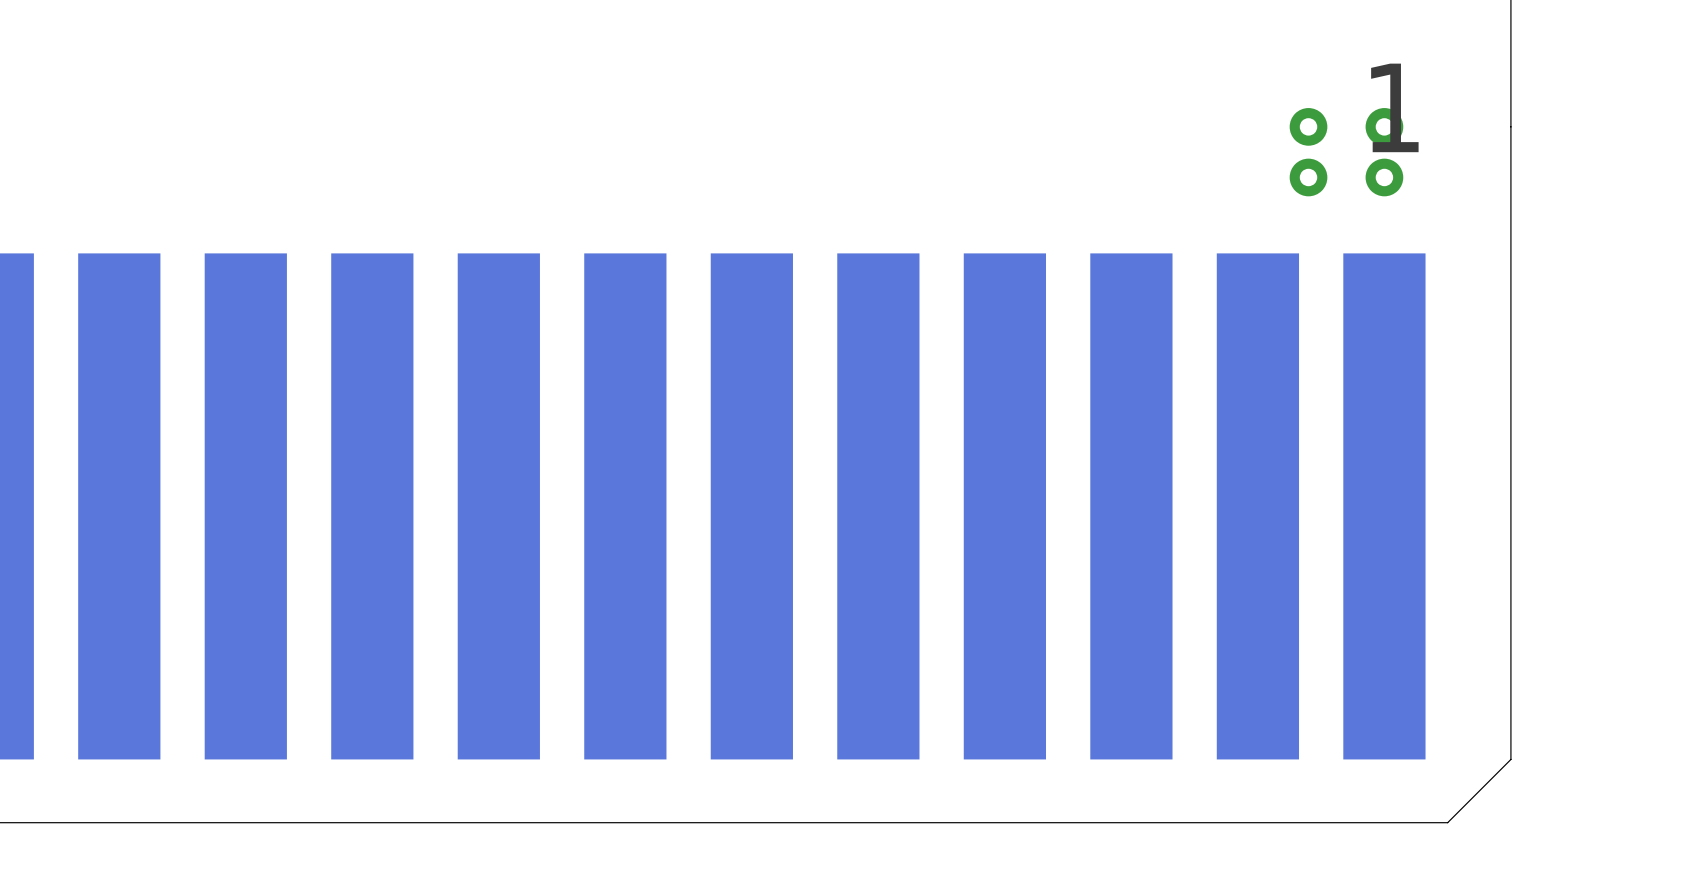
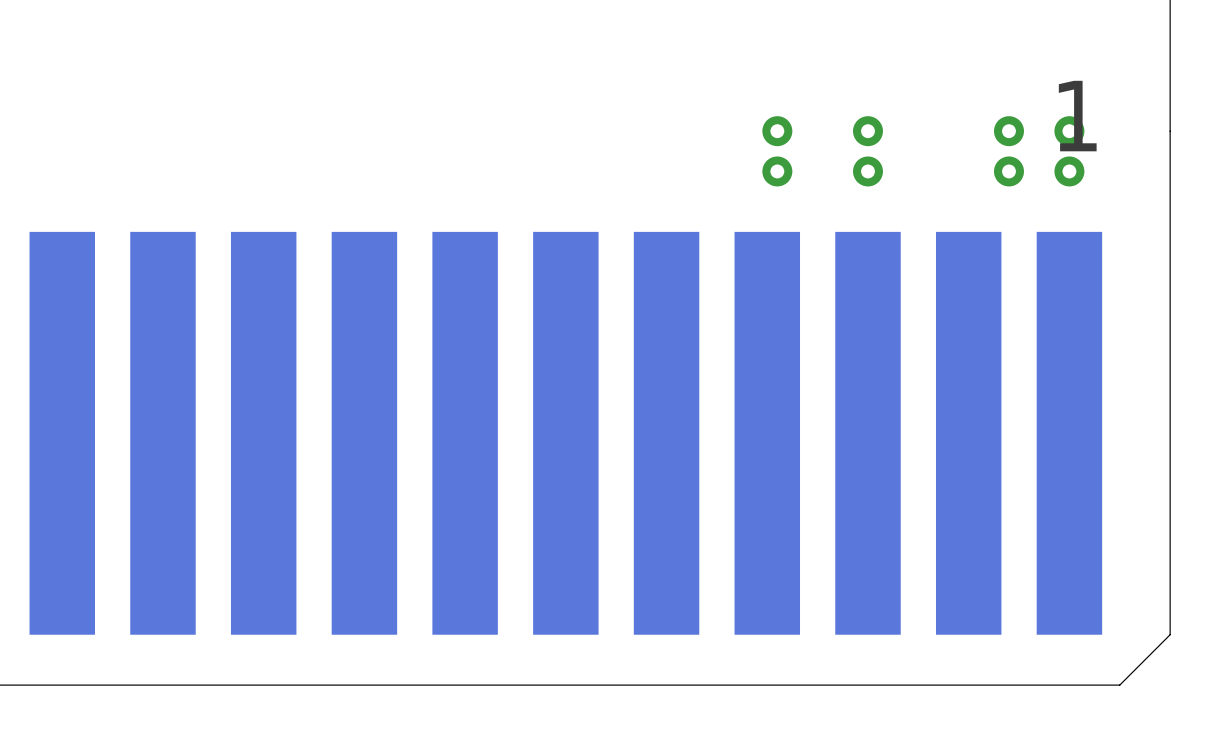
via: none -> (777, 131)
via: none -> (867, 131)
via: none -> (777, 171)
via: none -> (867, 171)

